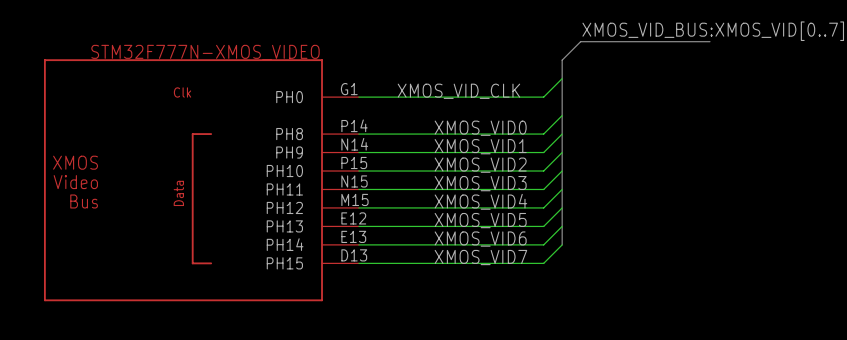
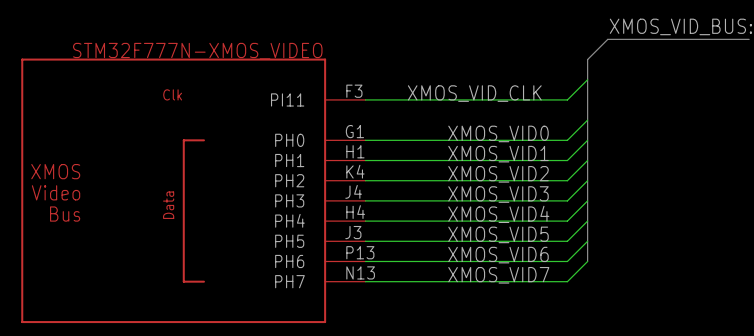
STM32F777N-XMOS_VIDEO symbol: [43, 59, 359, 302] -> [21, 58, 366, 324]

